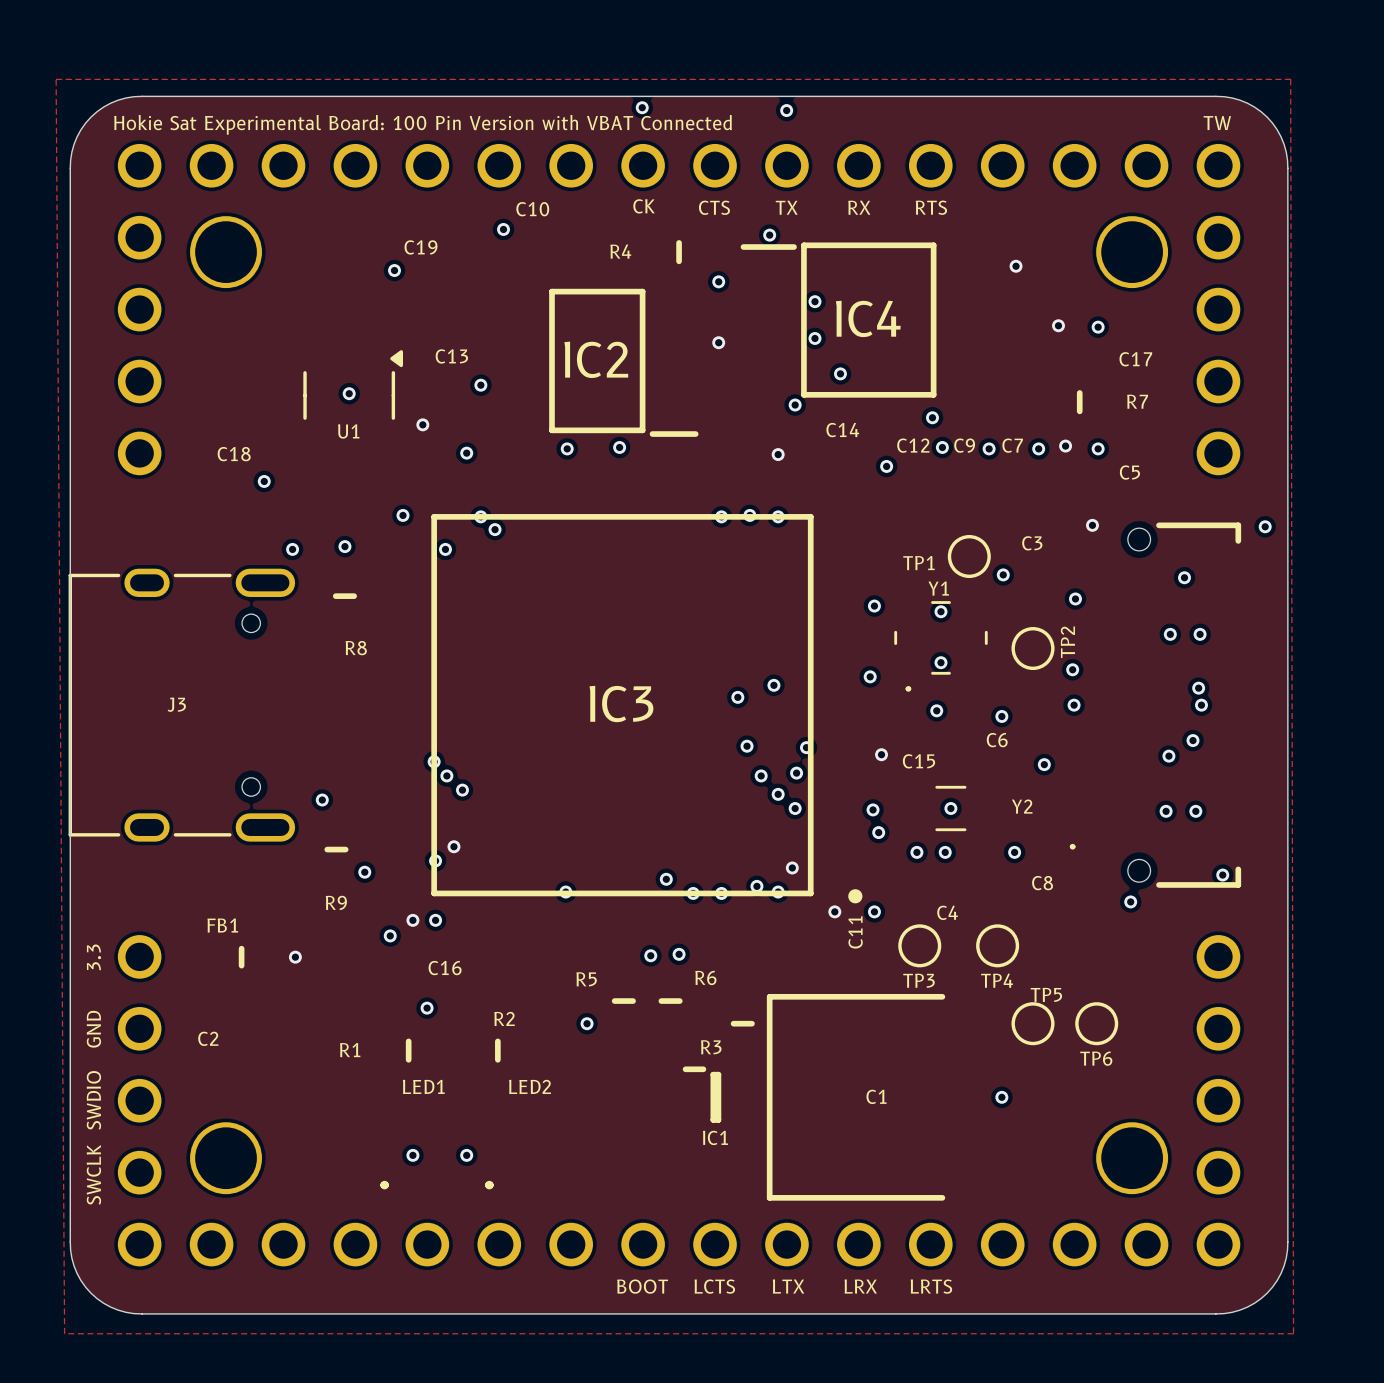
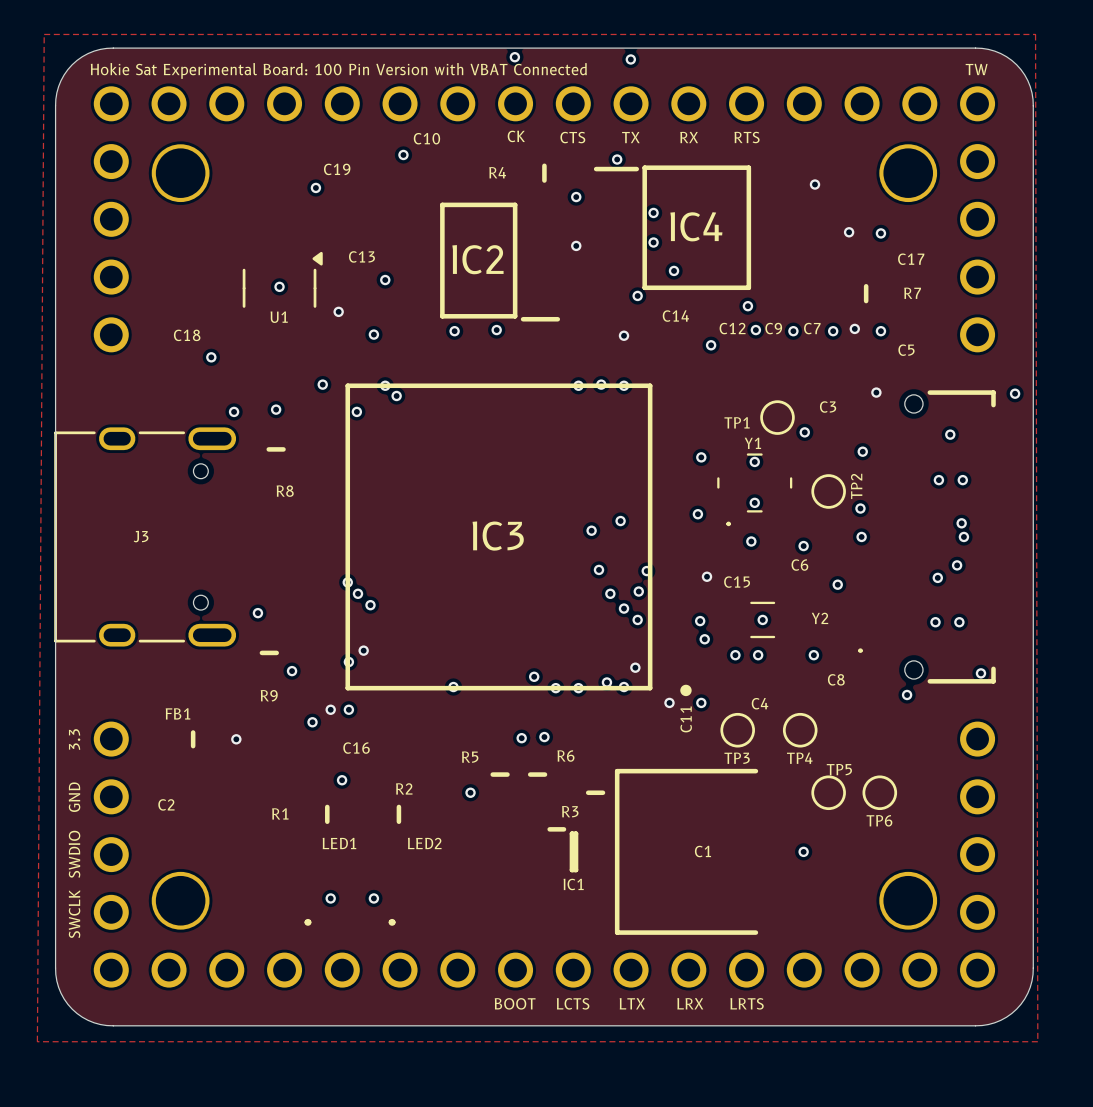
zone outline: (56, 79) (64, 1333) -> (44, 34) (37, 1041) (51, 1041)

